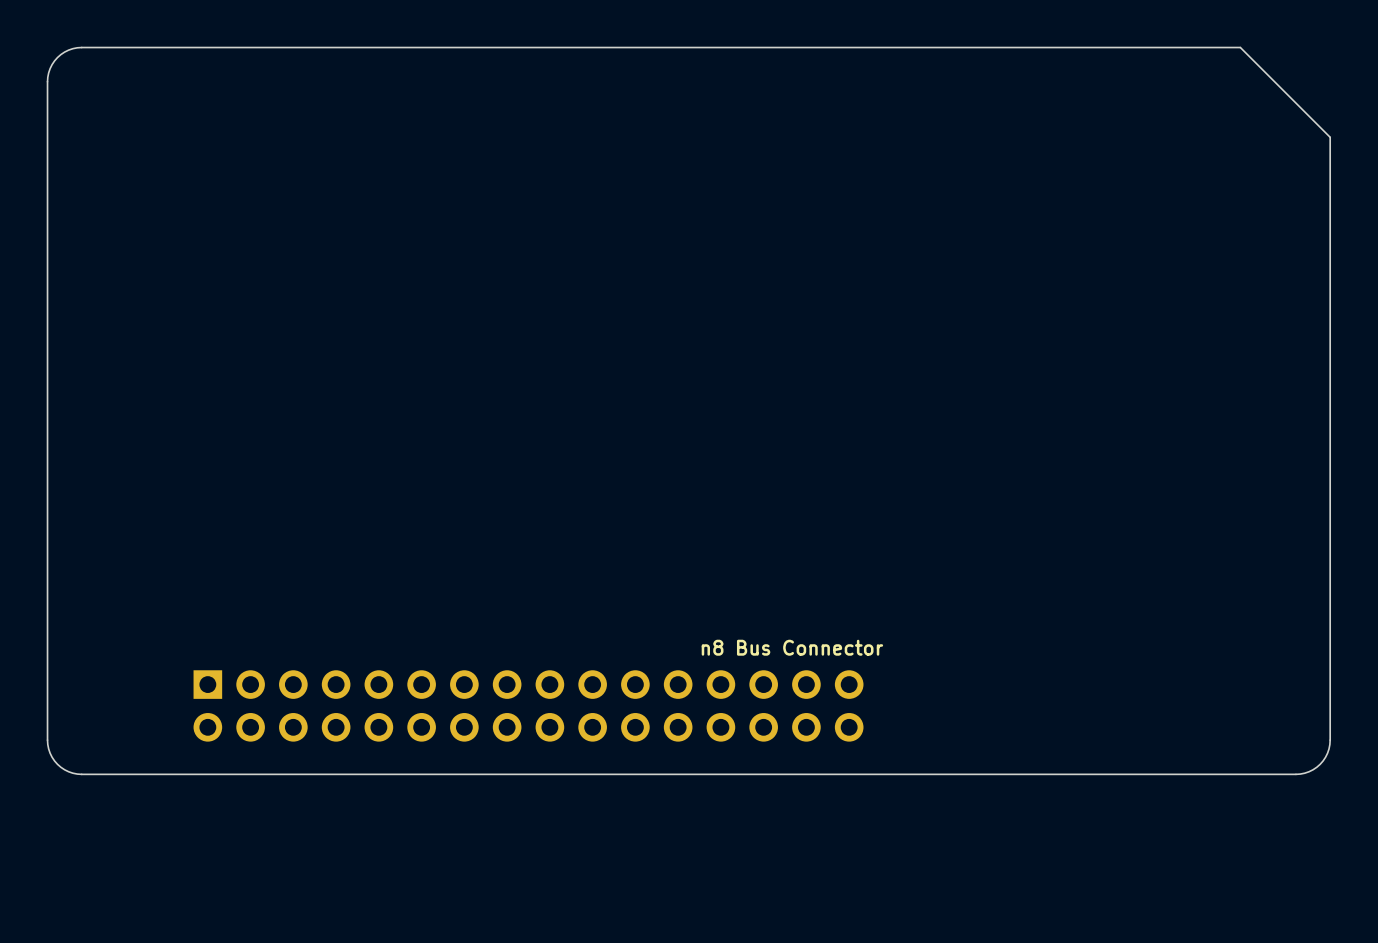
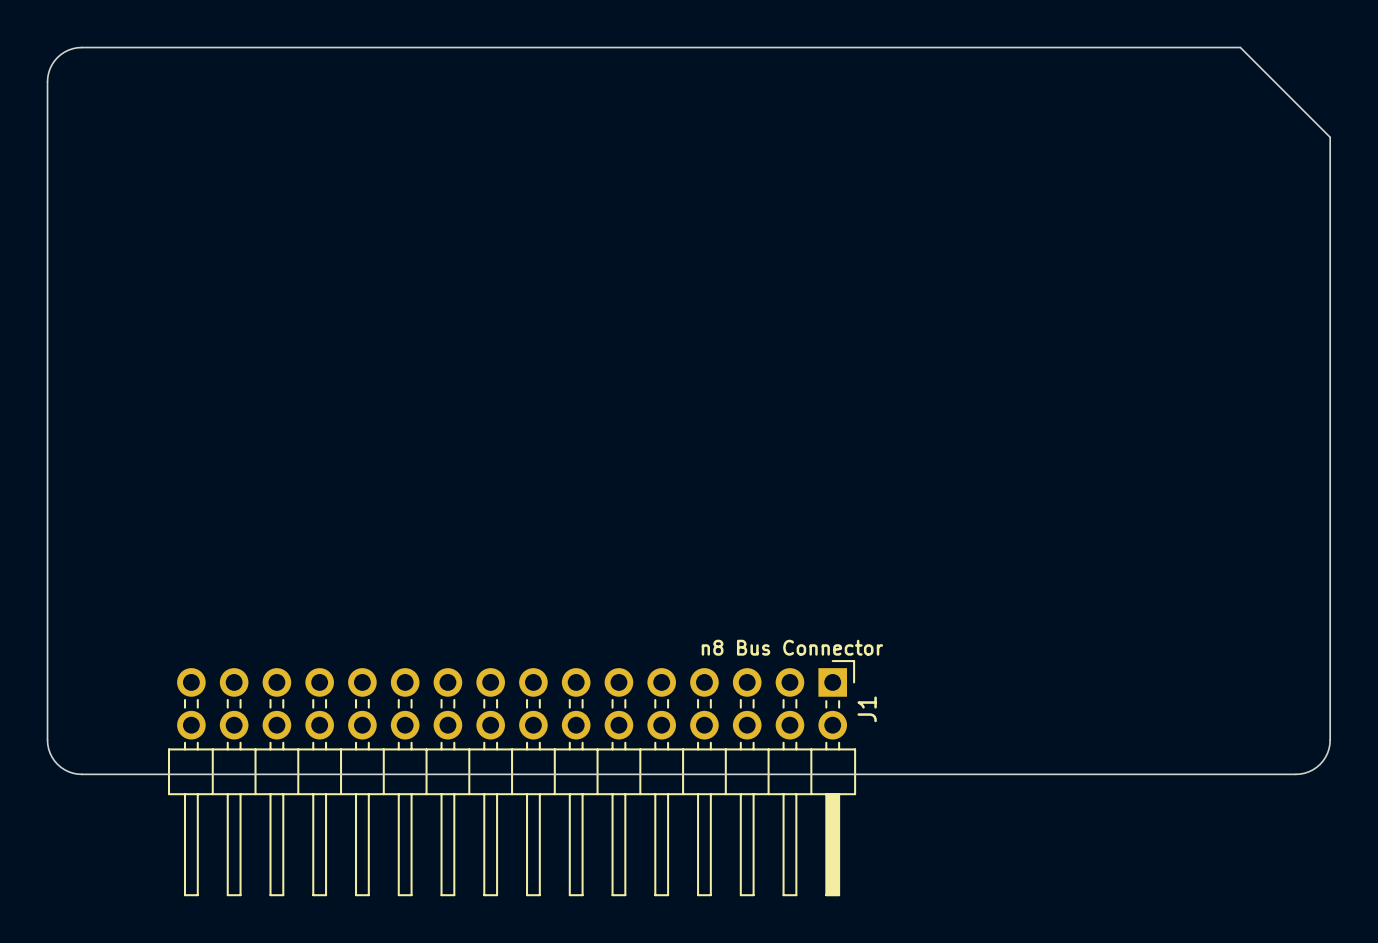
J1 side: bottom (528, 705) -> top (512, 778)

